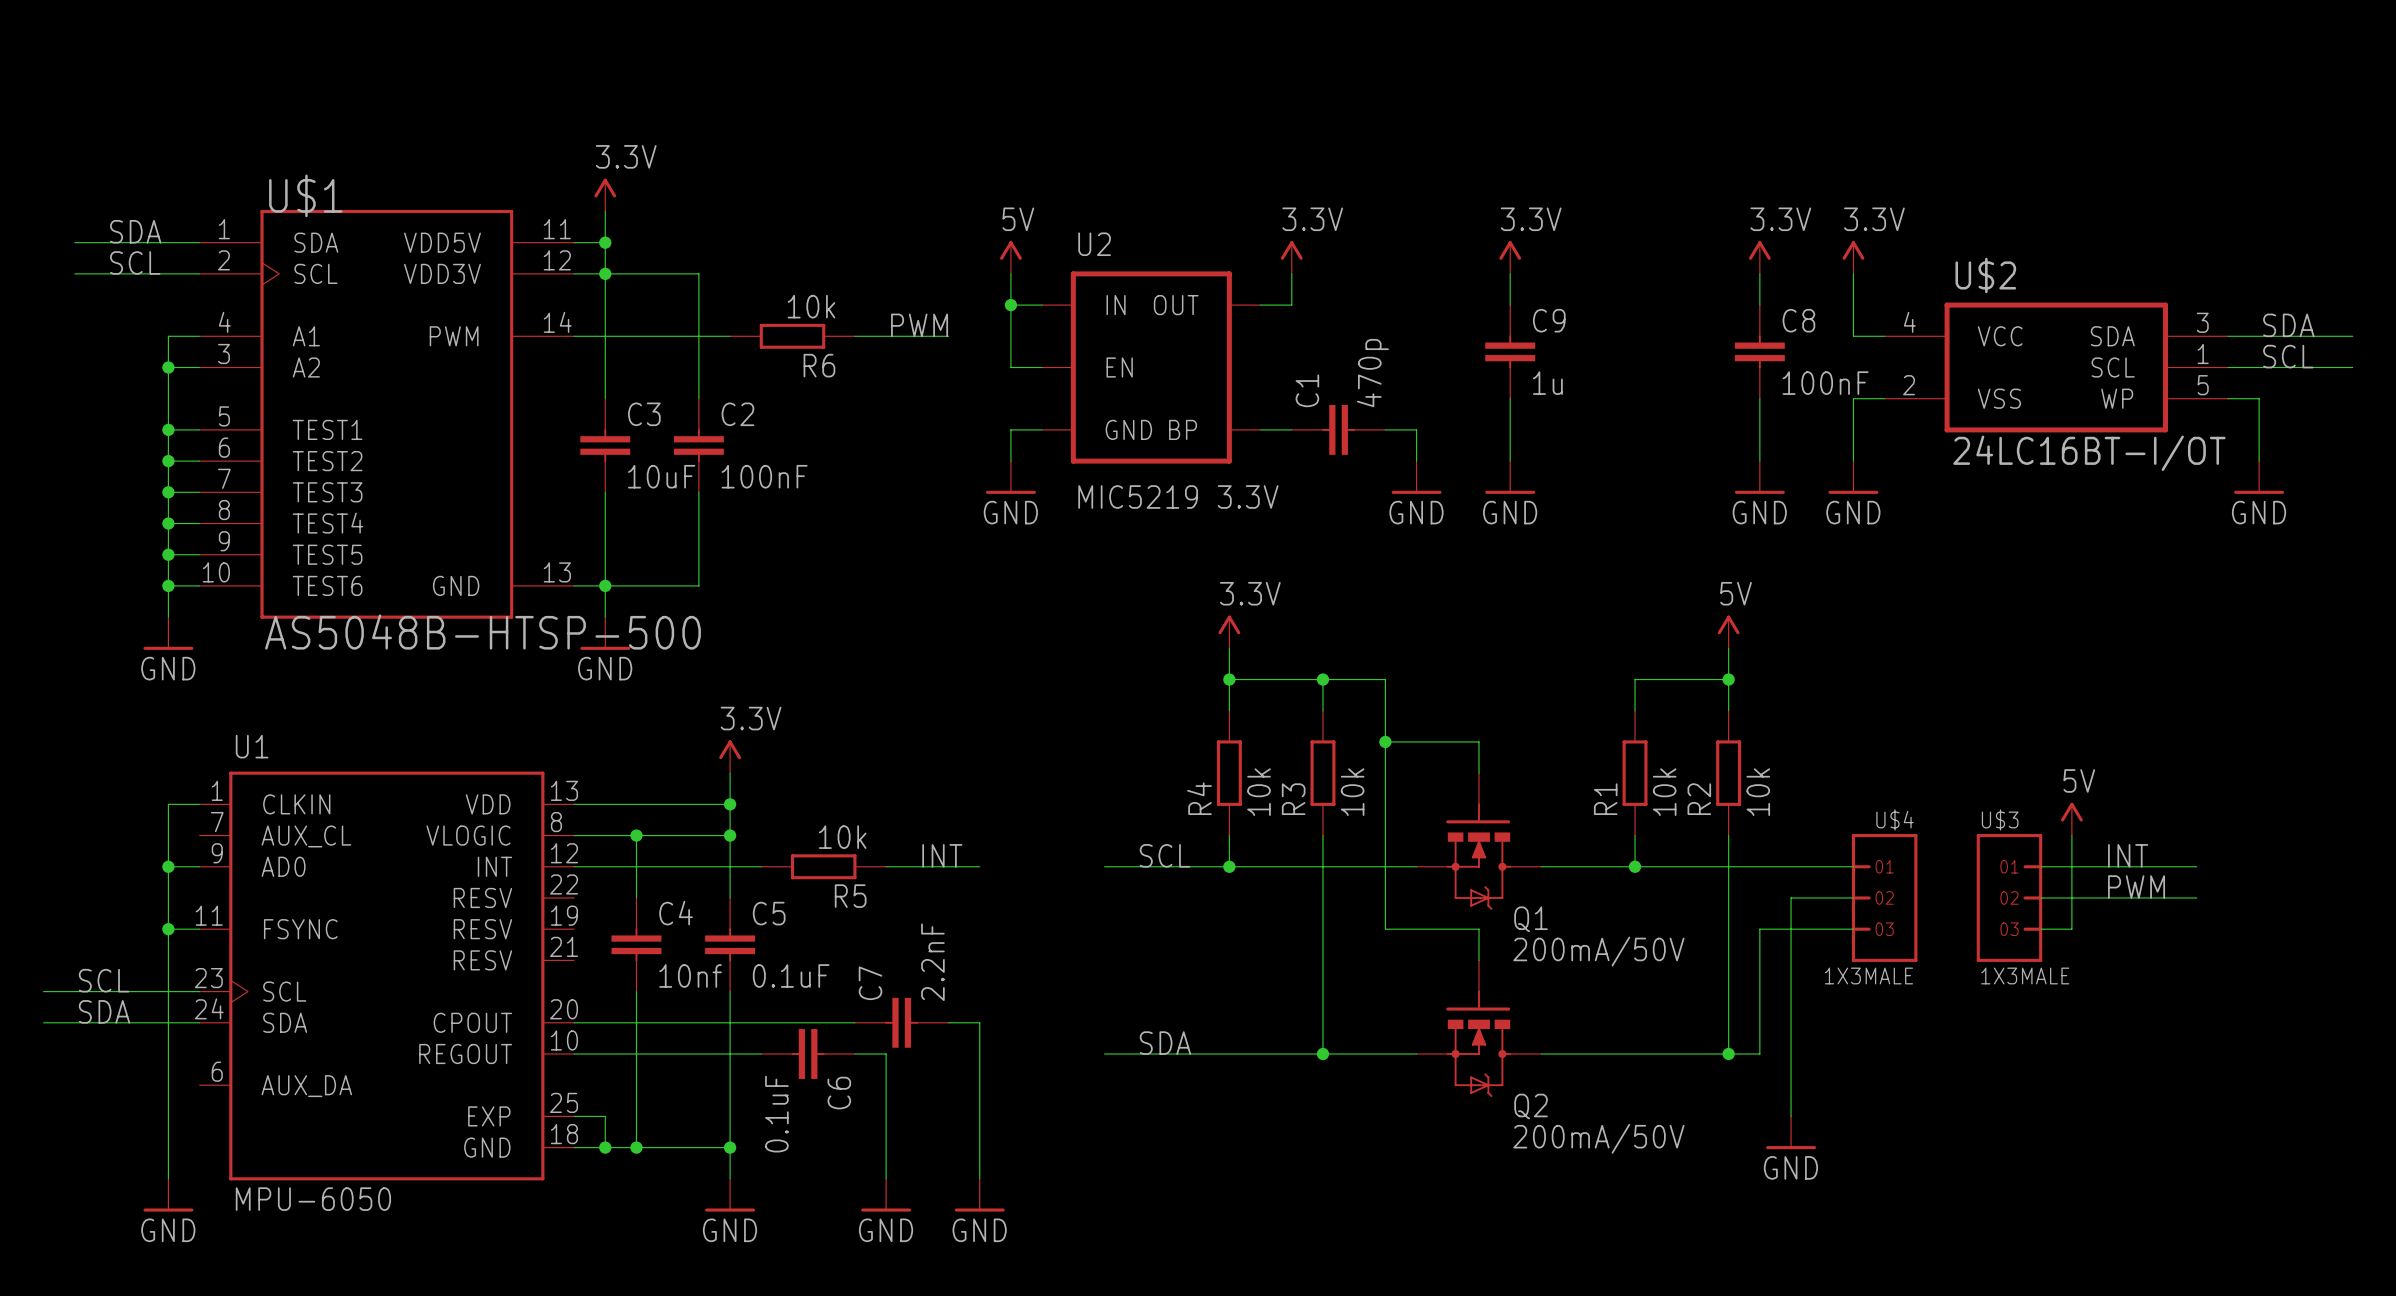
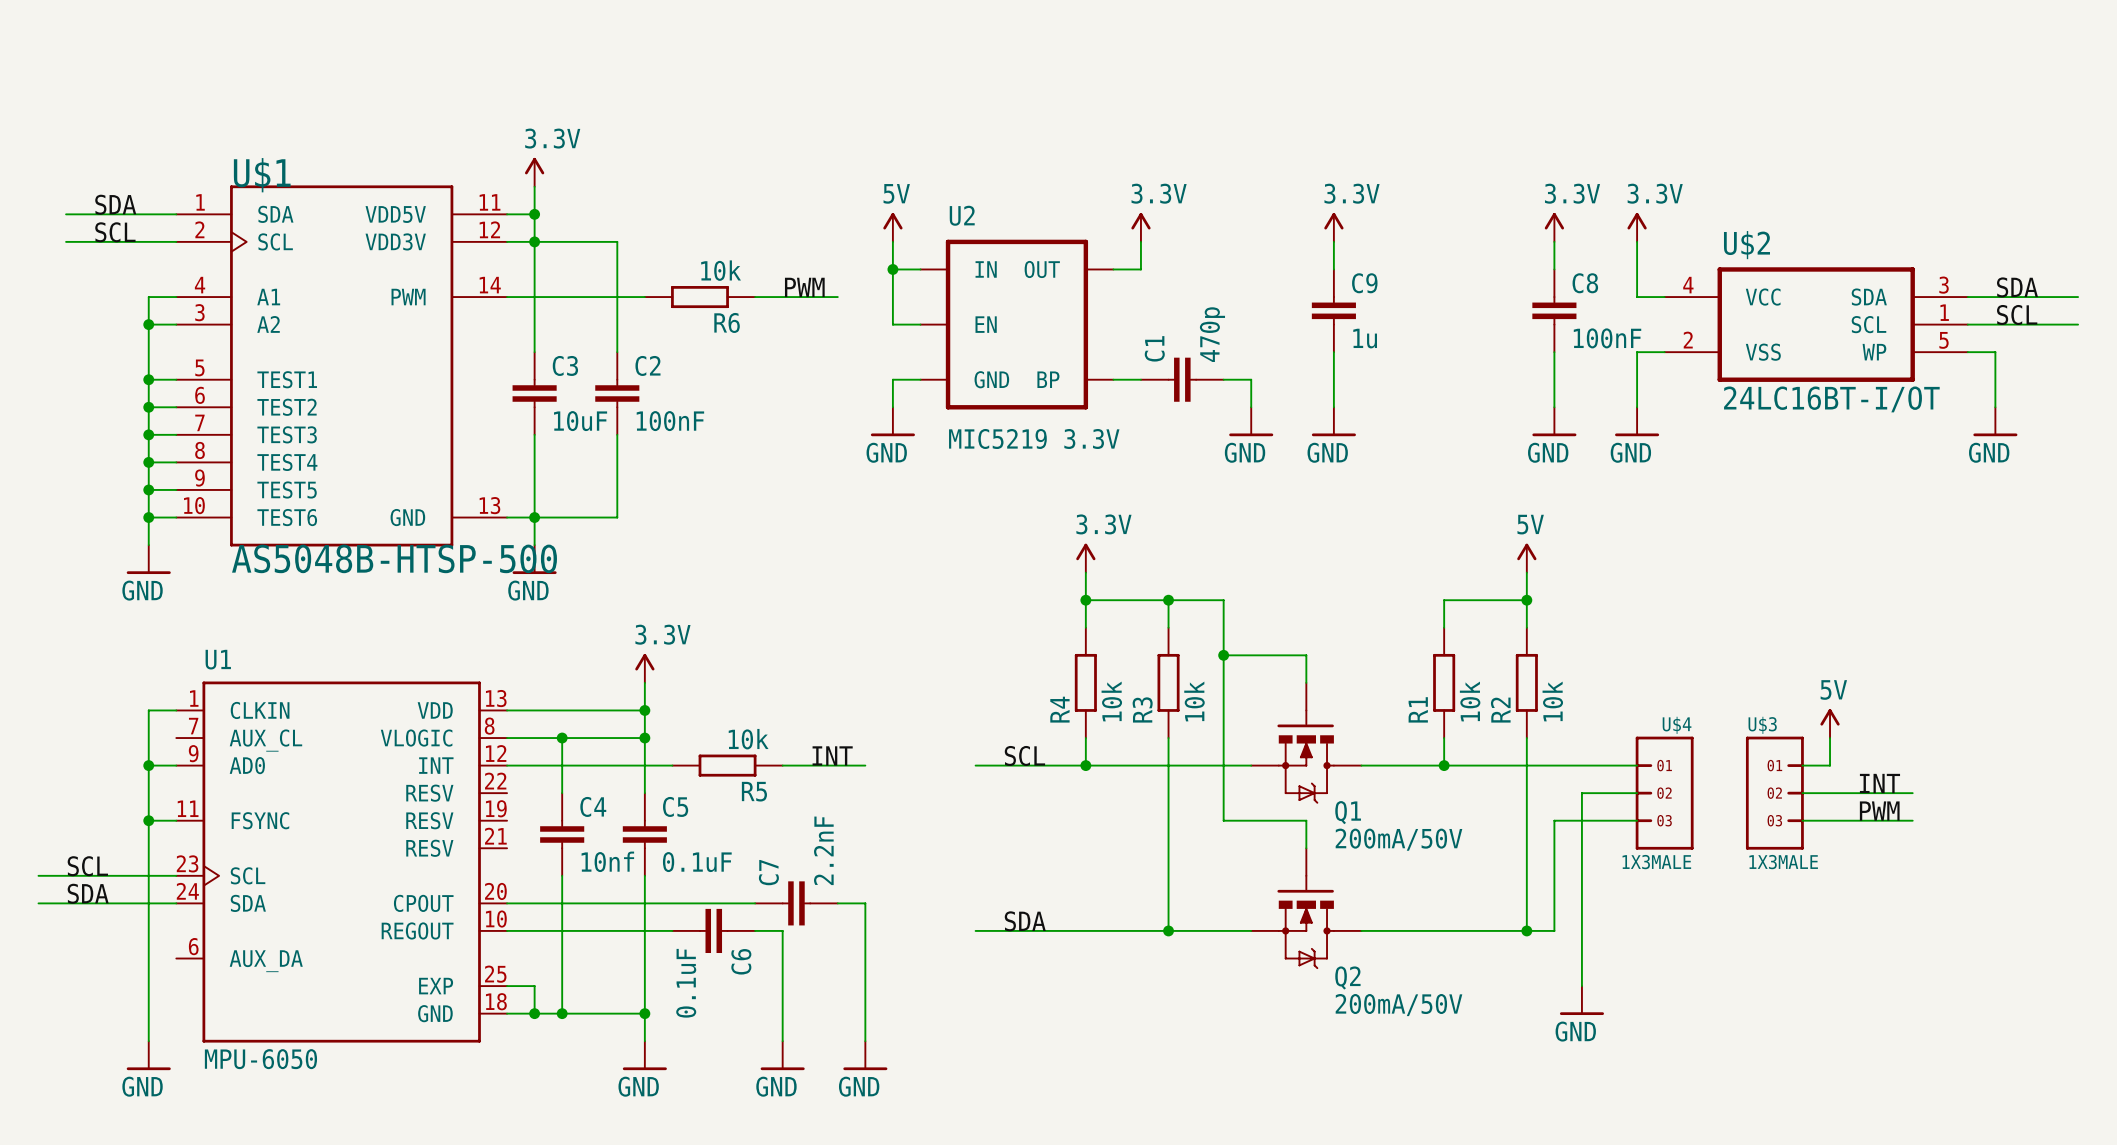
label: INT (2128, 855) -> none
wire: (2196, 866) (2071, 866) (2071, 929) -> (1912, 820) (1830, 820)
label: PWM (2136, 887) -> INT (1879, 783)
wire: (2165, 897) (2196, 897) -> none
label: none -> PWM (1879, 811)

